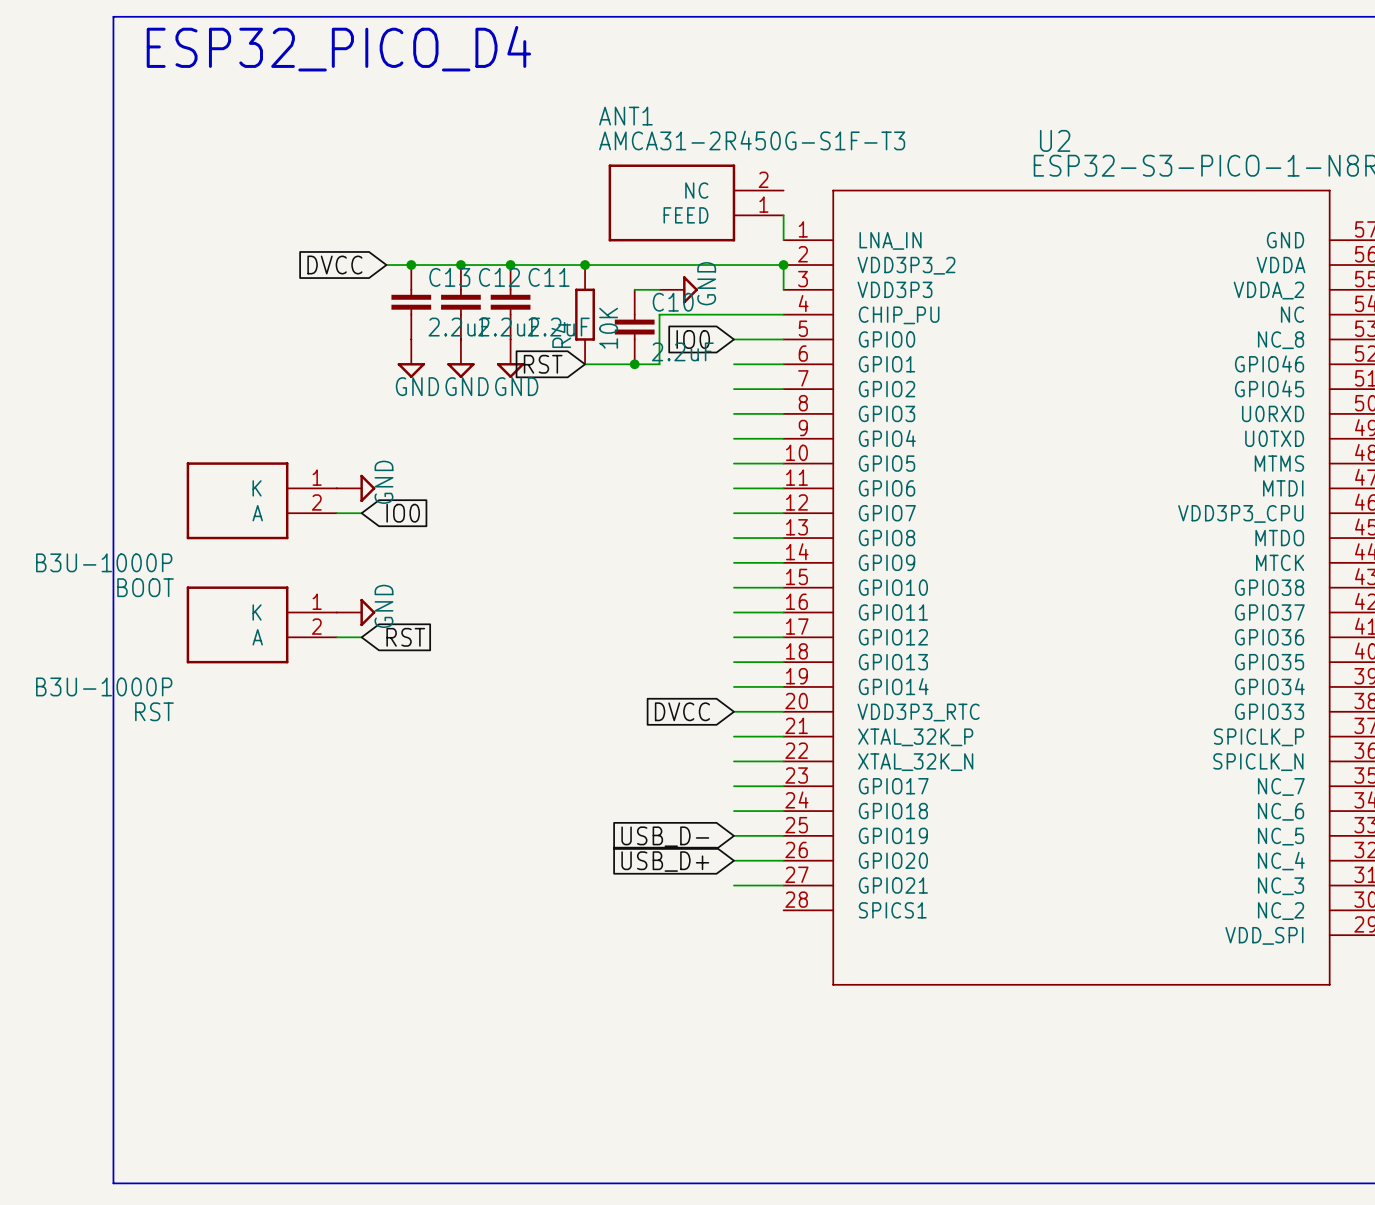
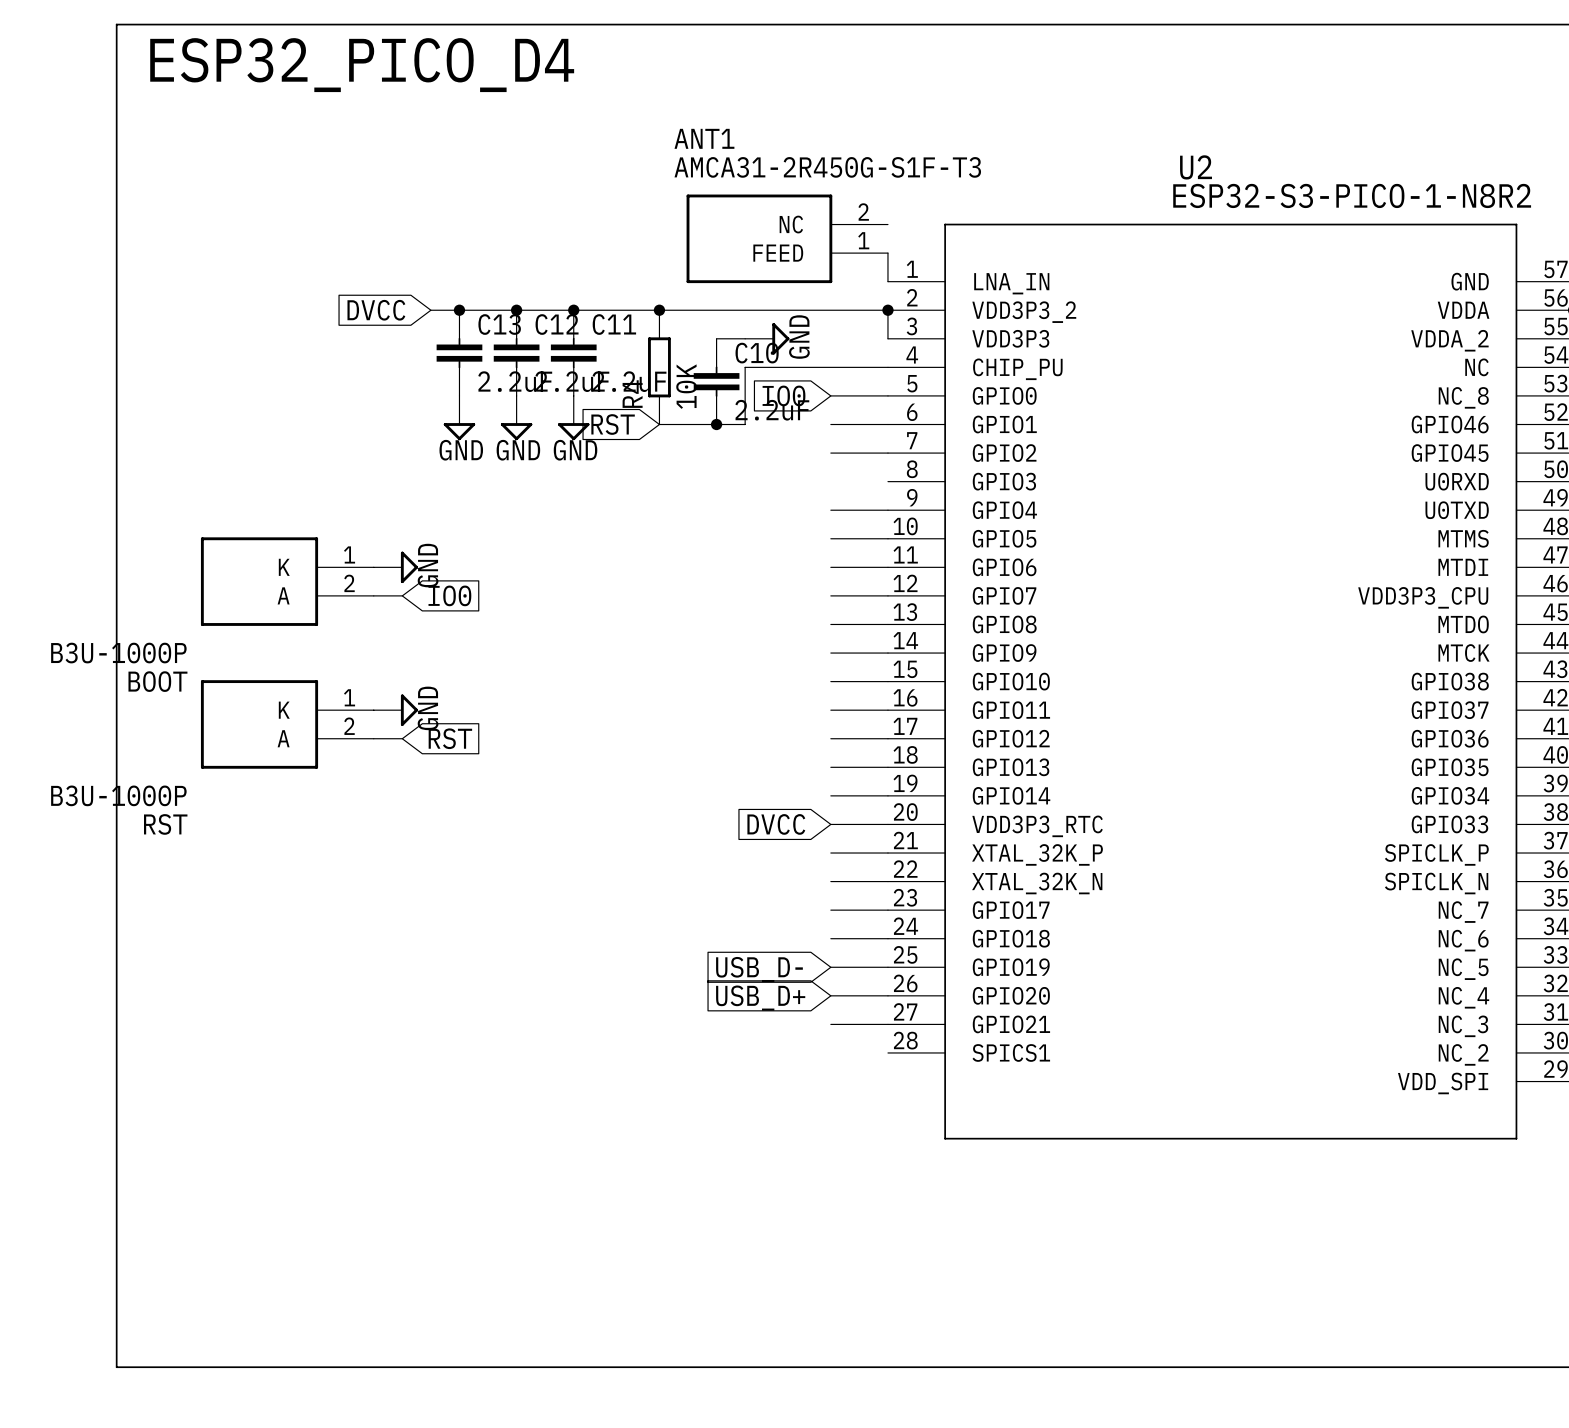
wire: (733, 413) (783, 413) -> none

